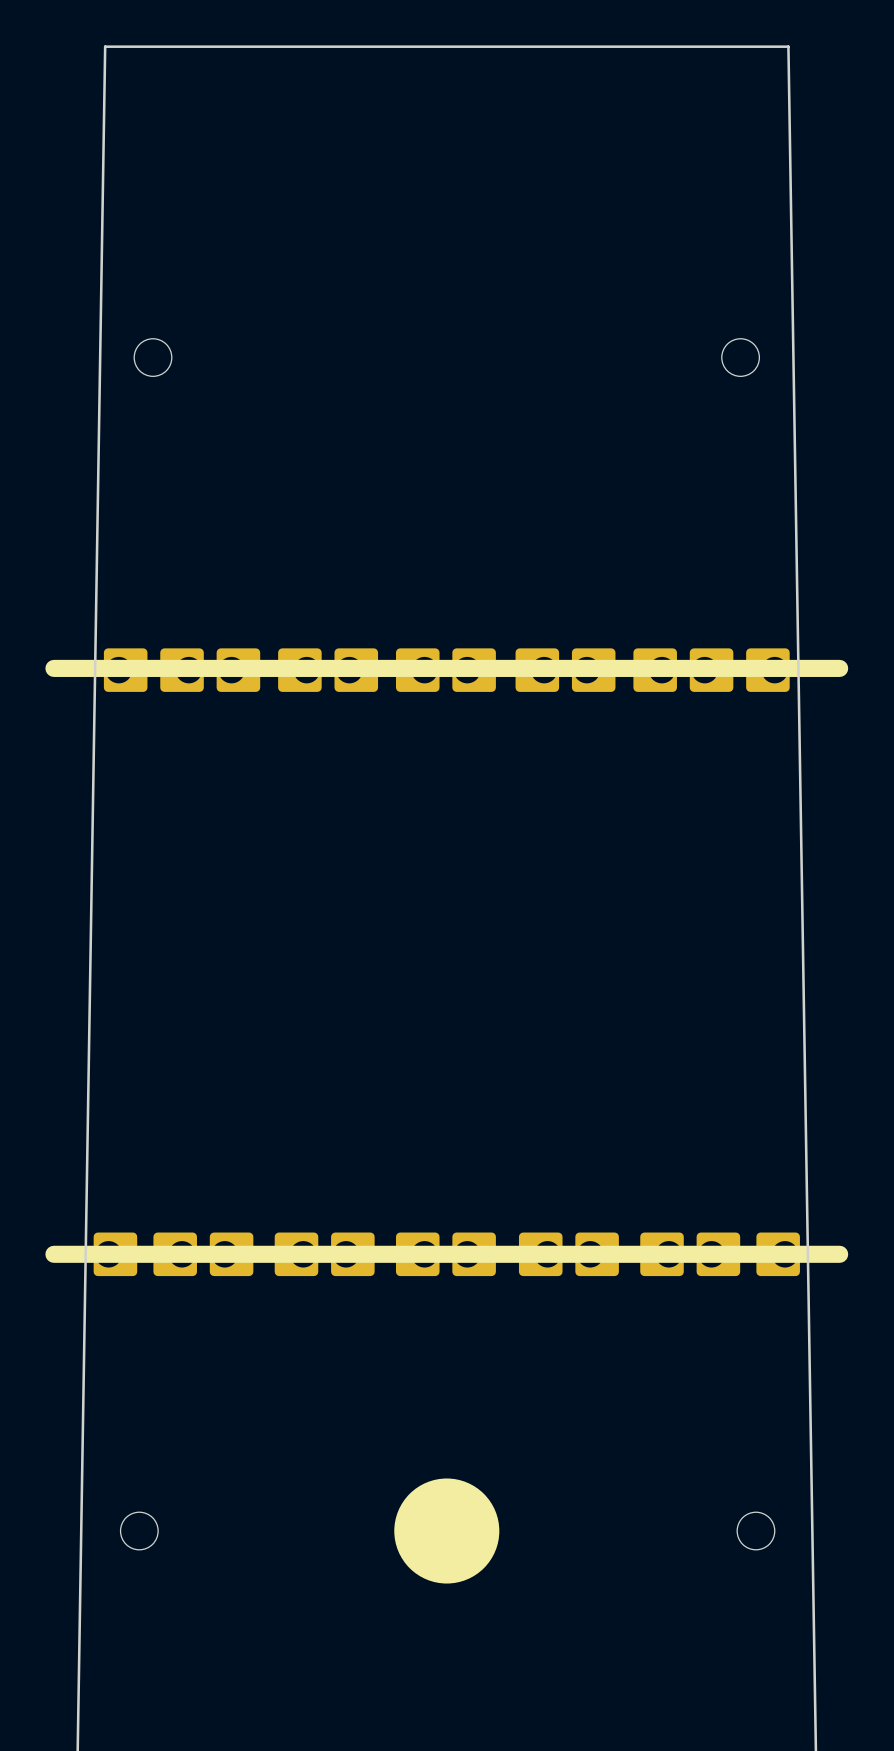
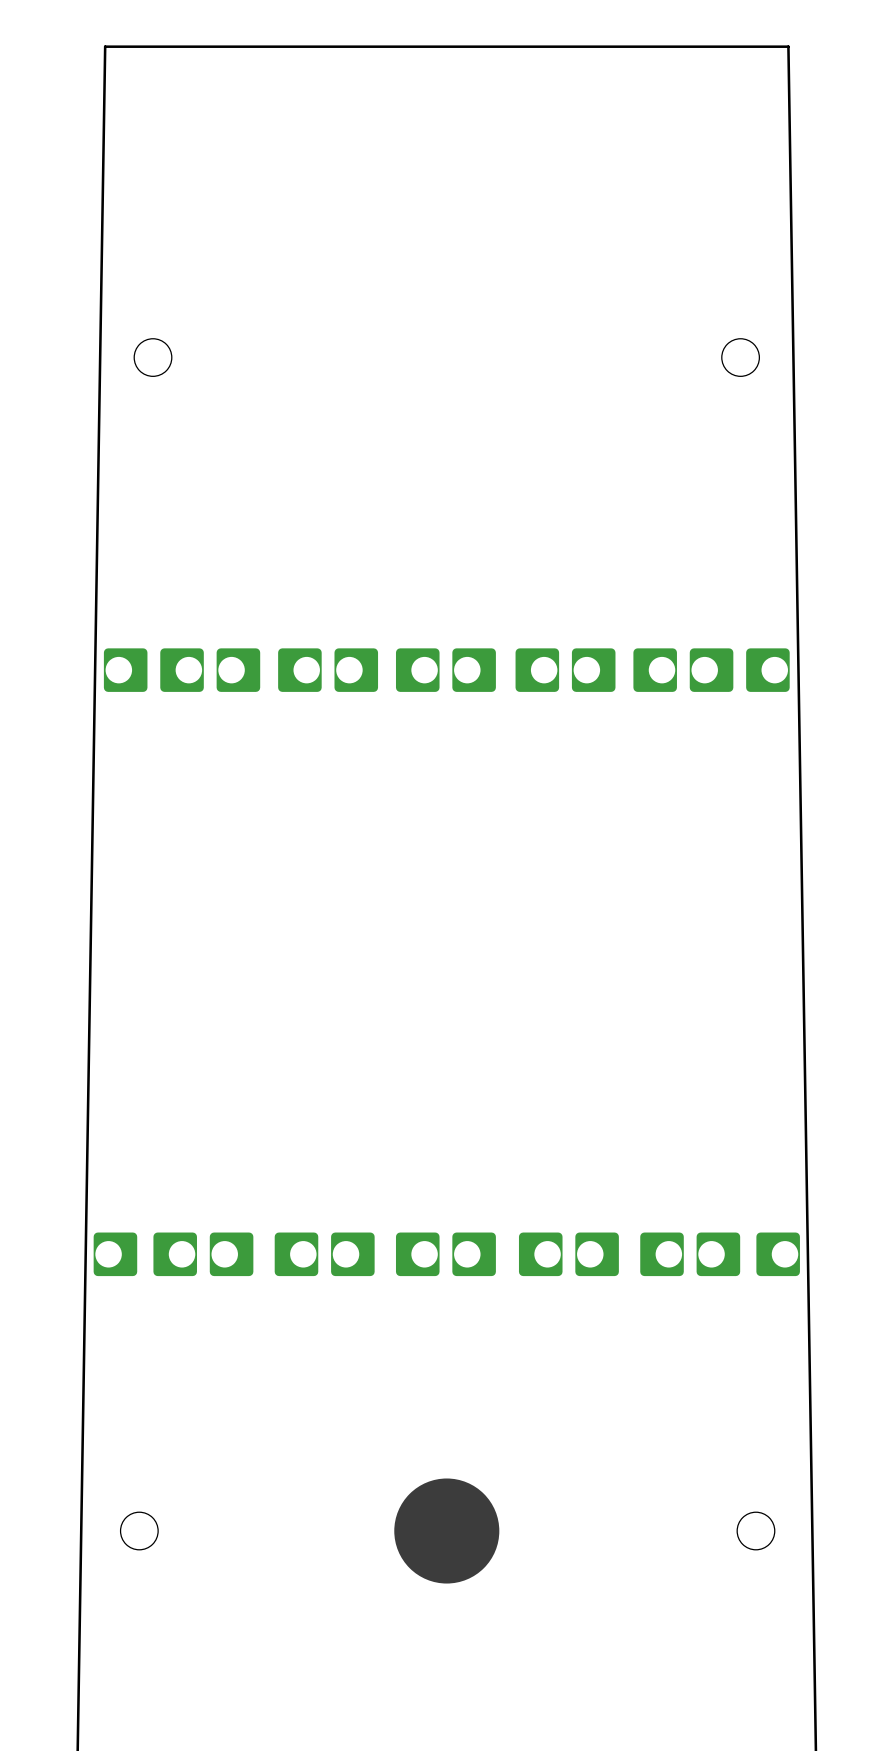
line: (839, 668) (53, 668) -> none
line: (839, 1254) (53, 1254) -> none

